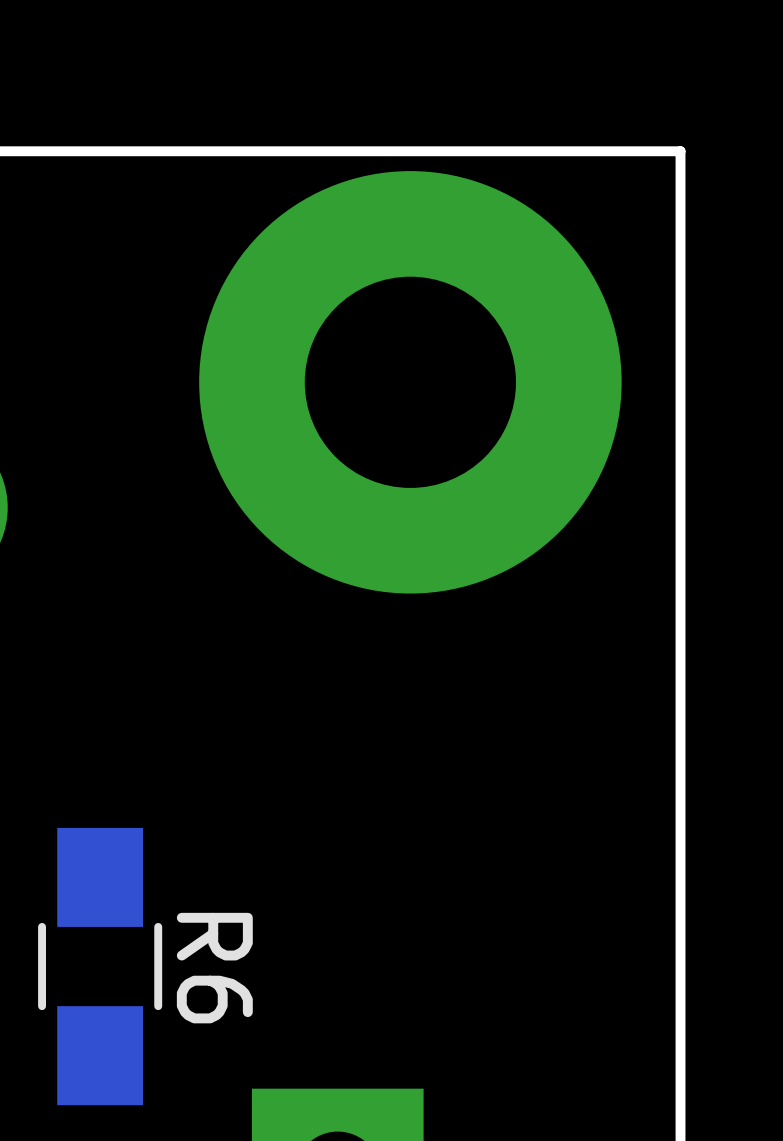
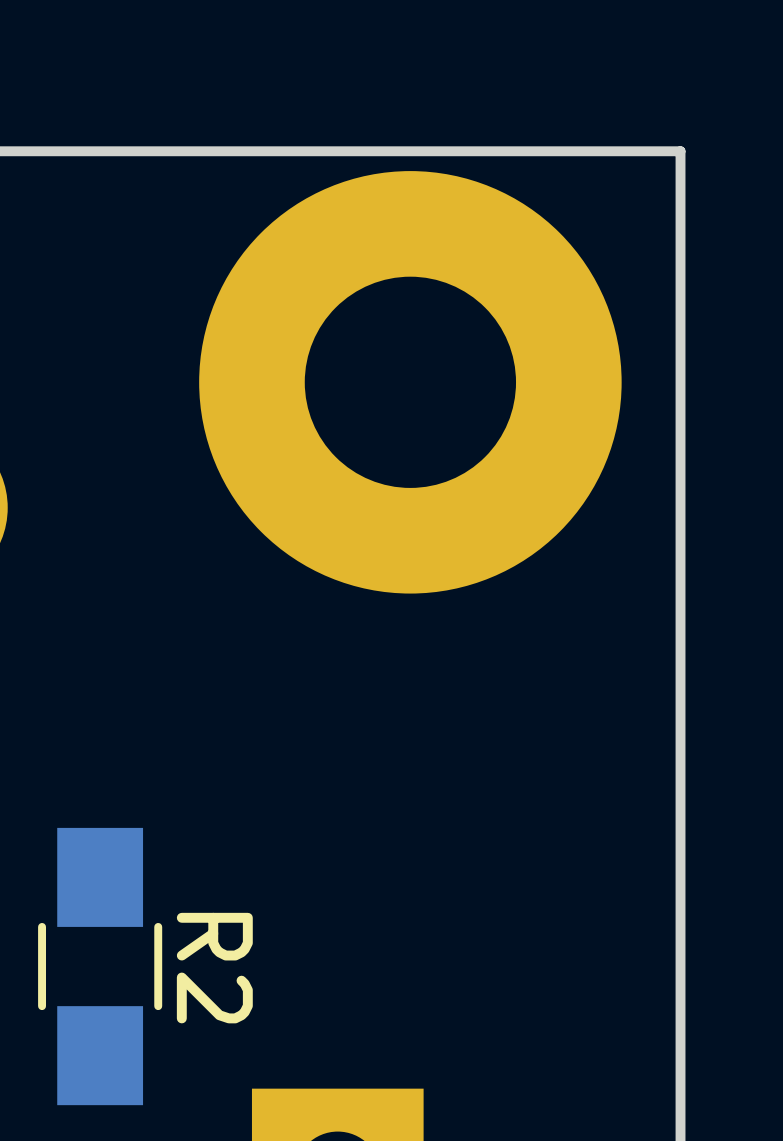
R6 name: R6 (214, 968) -> R2 (214, 968)

